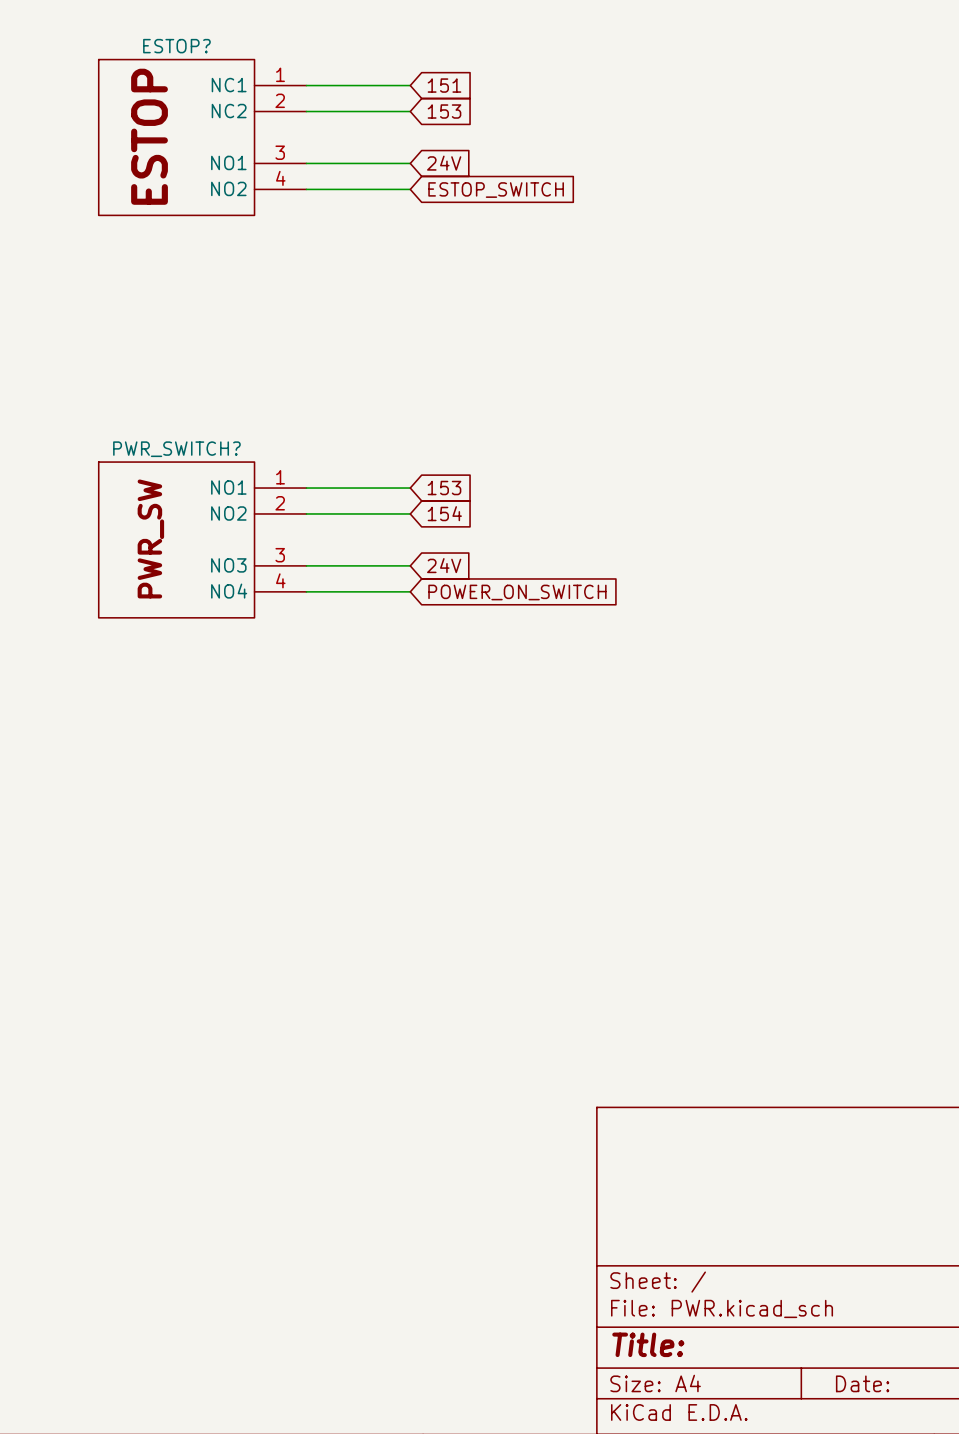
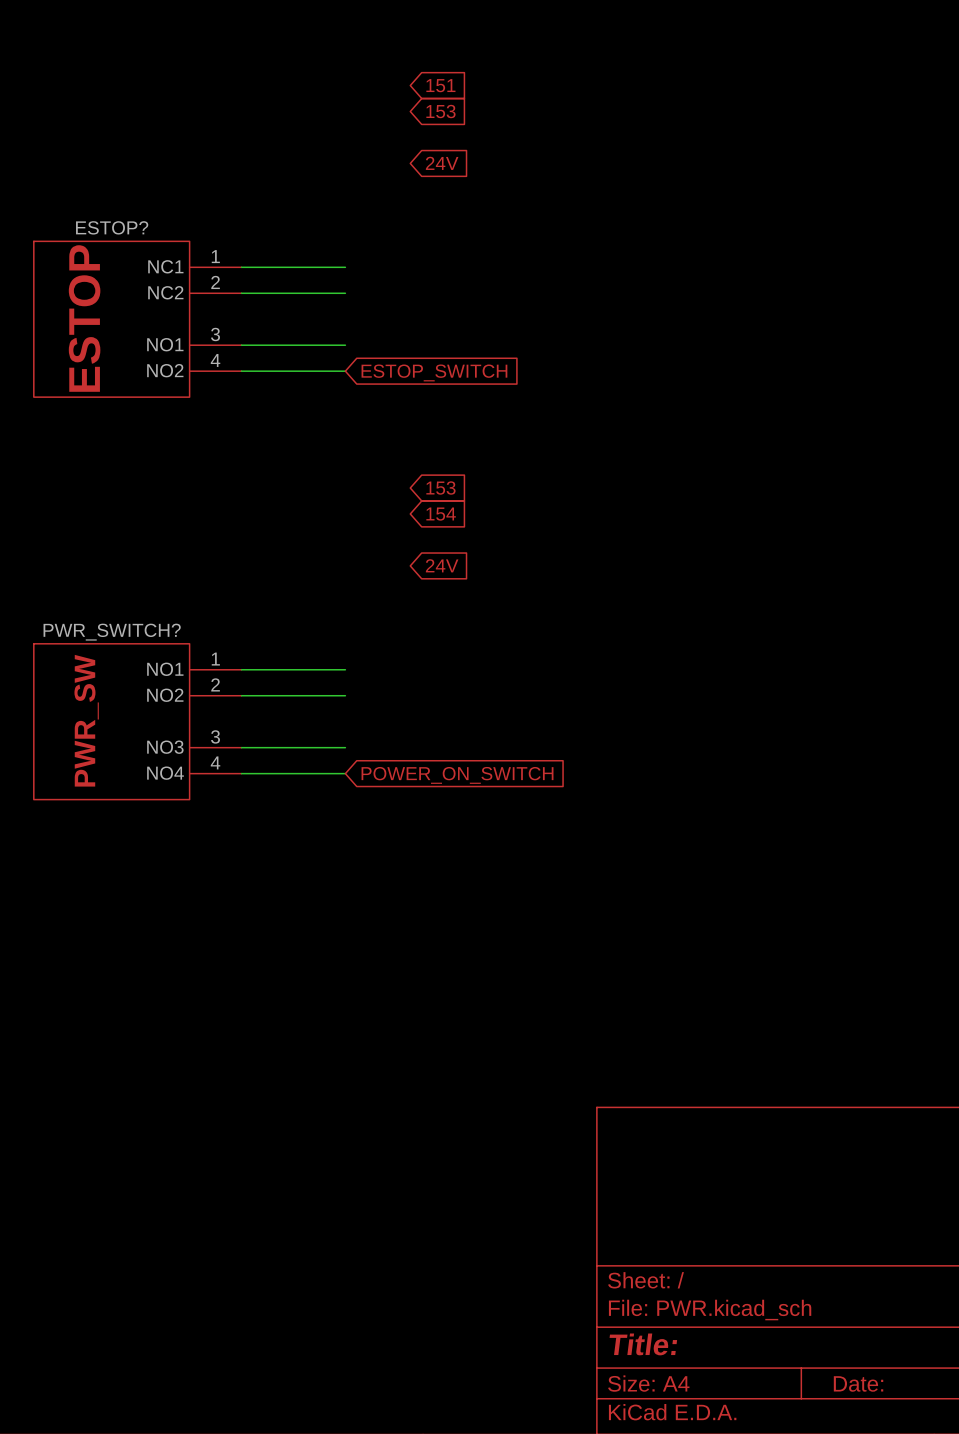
wire: (306, 85) (410, 85) -> (241, 267) (345, 267)
wire: (306, 111) (410, 111) -> (241, 293) (345, 293)
ESTOP? position: (202, 137) -> (137, 319)
wire: (306, 163) (410, 163) -> (241, 345) (345, 345)
wire: (306, 189) (410, 189) -> (241, 371) (345, 371)
global label position: ESTOP_SWITCH (496, 190) -> ESTOP_SWITCH (434, 372)
wire: (306, 488) (410, 488) -> (241, 669) (345, 669)
wire: (306, 513) (410, 513) -> (241, 695) (345, 695)
PWR_SWITCH? position: (202, 539) -> (137, 721)
wire: (306, 565) (410, 565) -> (241, 747) (345, 747)
wire: (306, 591) (410, 591) -> (241, 773) (345, 773)
global label position: POWER_ON_SWITCH (517, 592) -> POWER_ON_SWITCH (457, 775)

